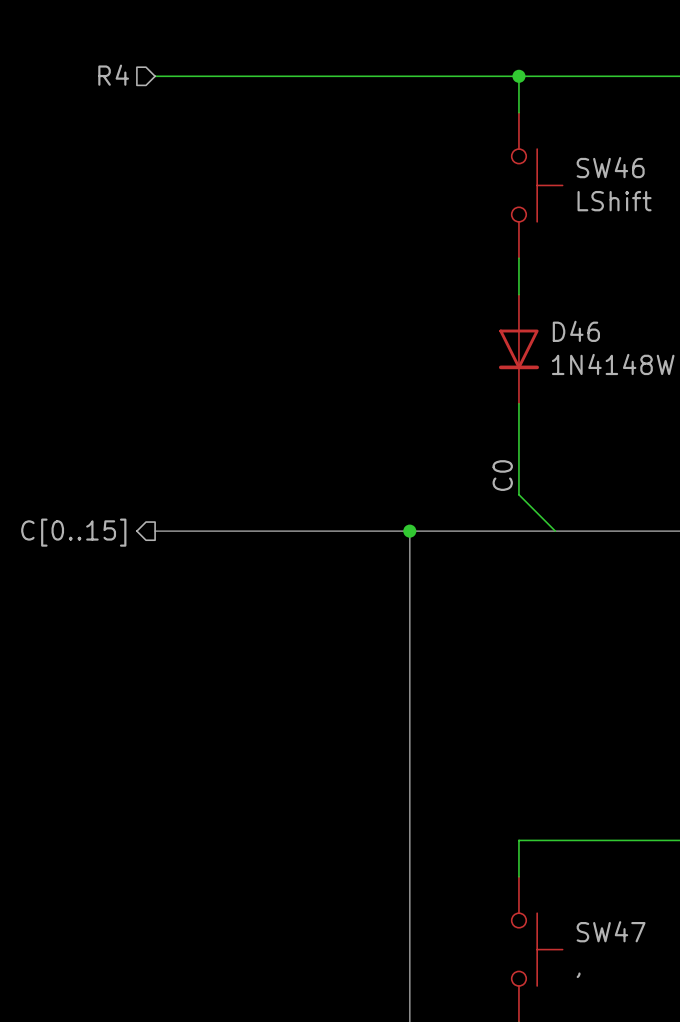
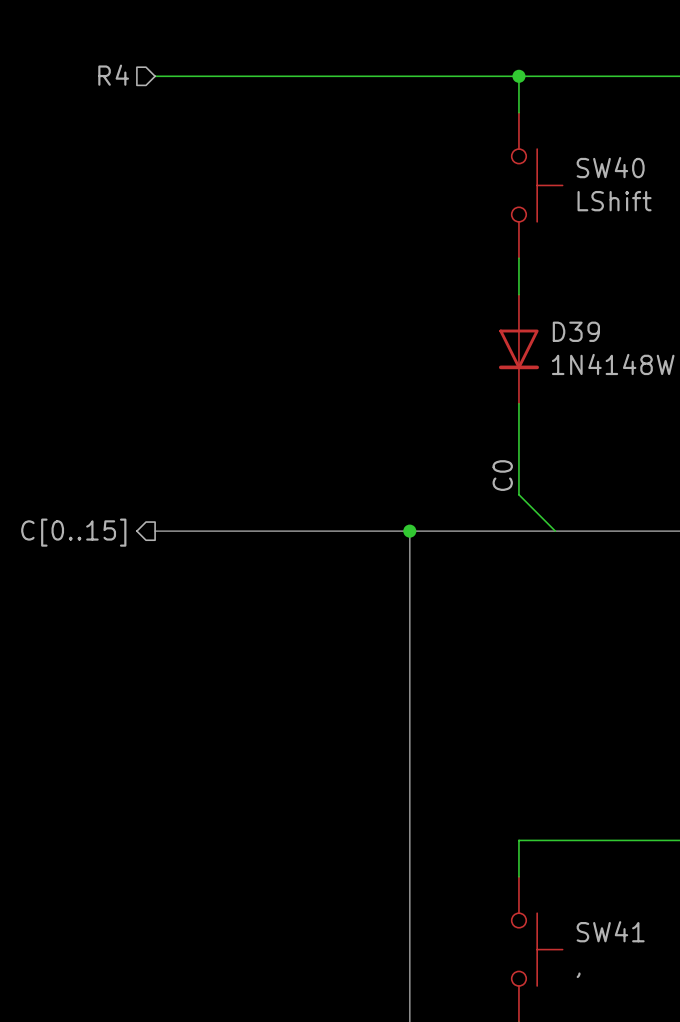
SW46 name: SW46 (610, 167) -> SW40 (610, 167)
D46 name: D46 (576, 331) -> D39 (576, 331)
SW47 name: SW47 (611, 931) -> SW41 (610, 931)

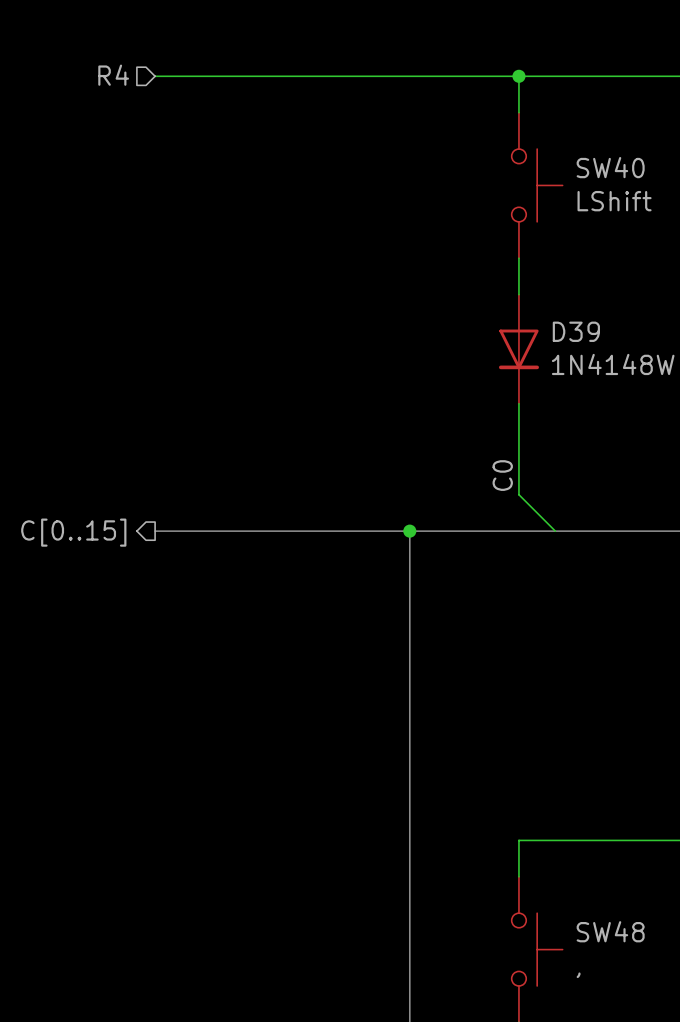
SW41 name: SW41 (610, 931) -> SW48 (610, 931)

